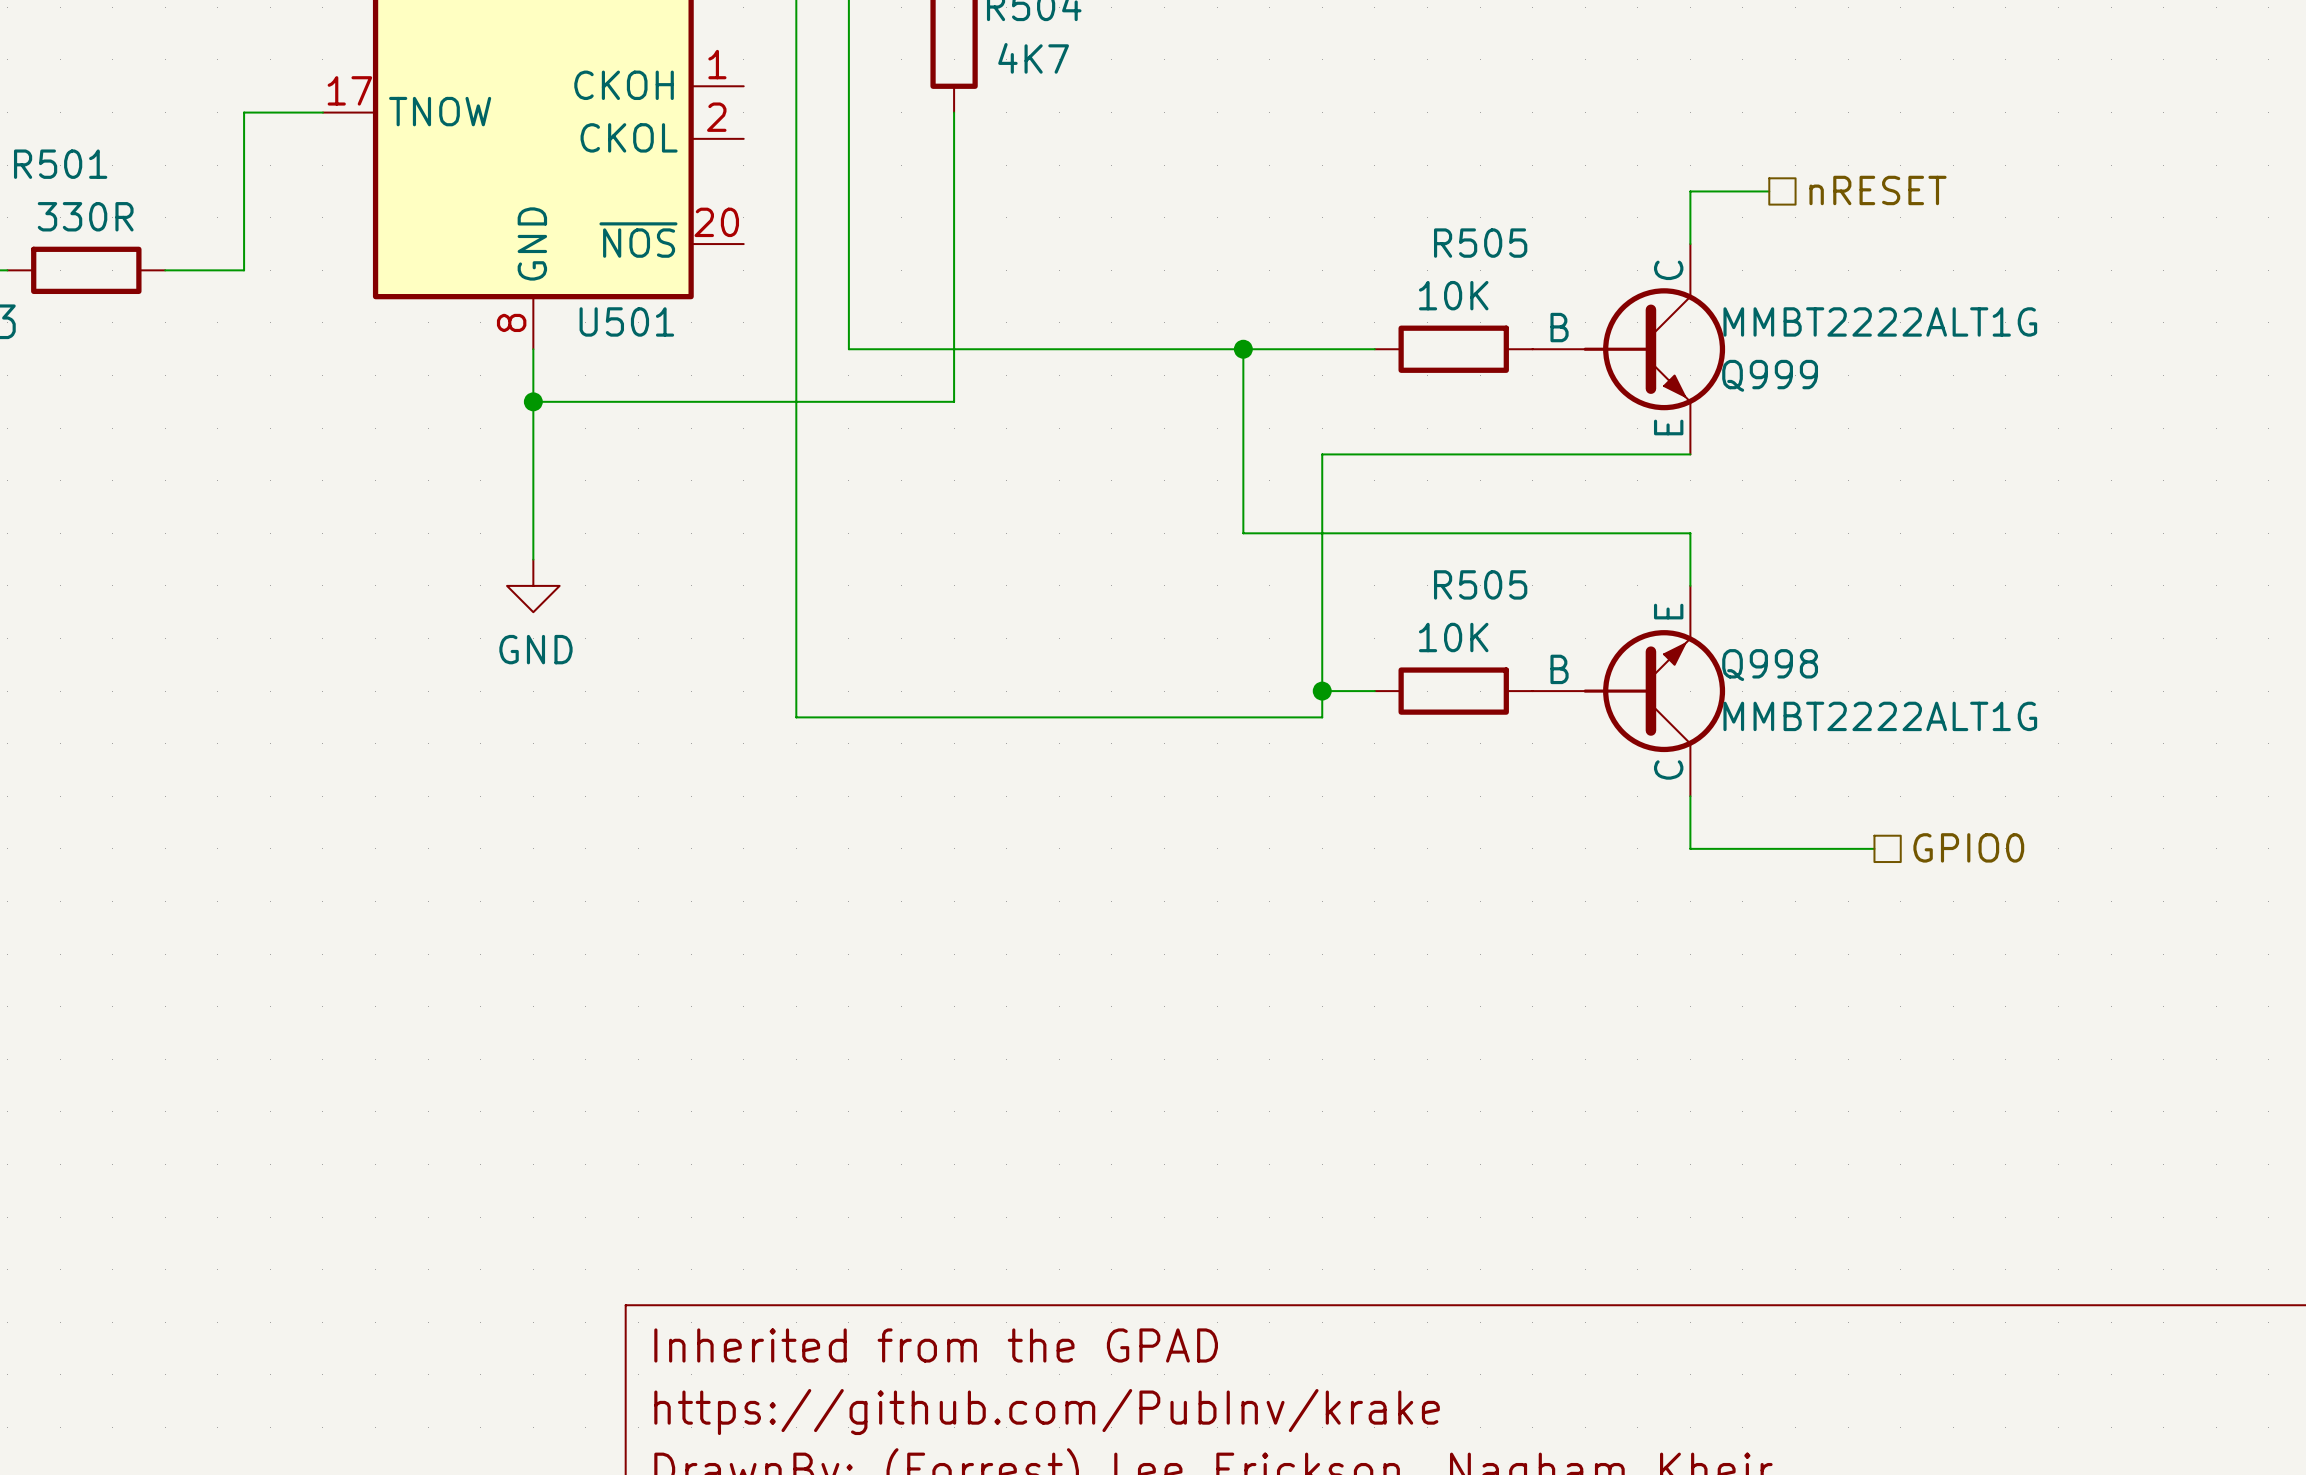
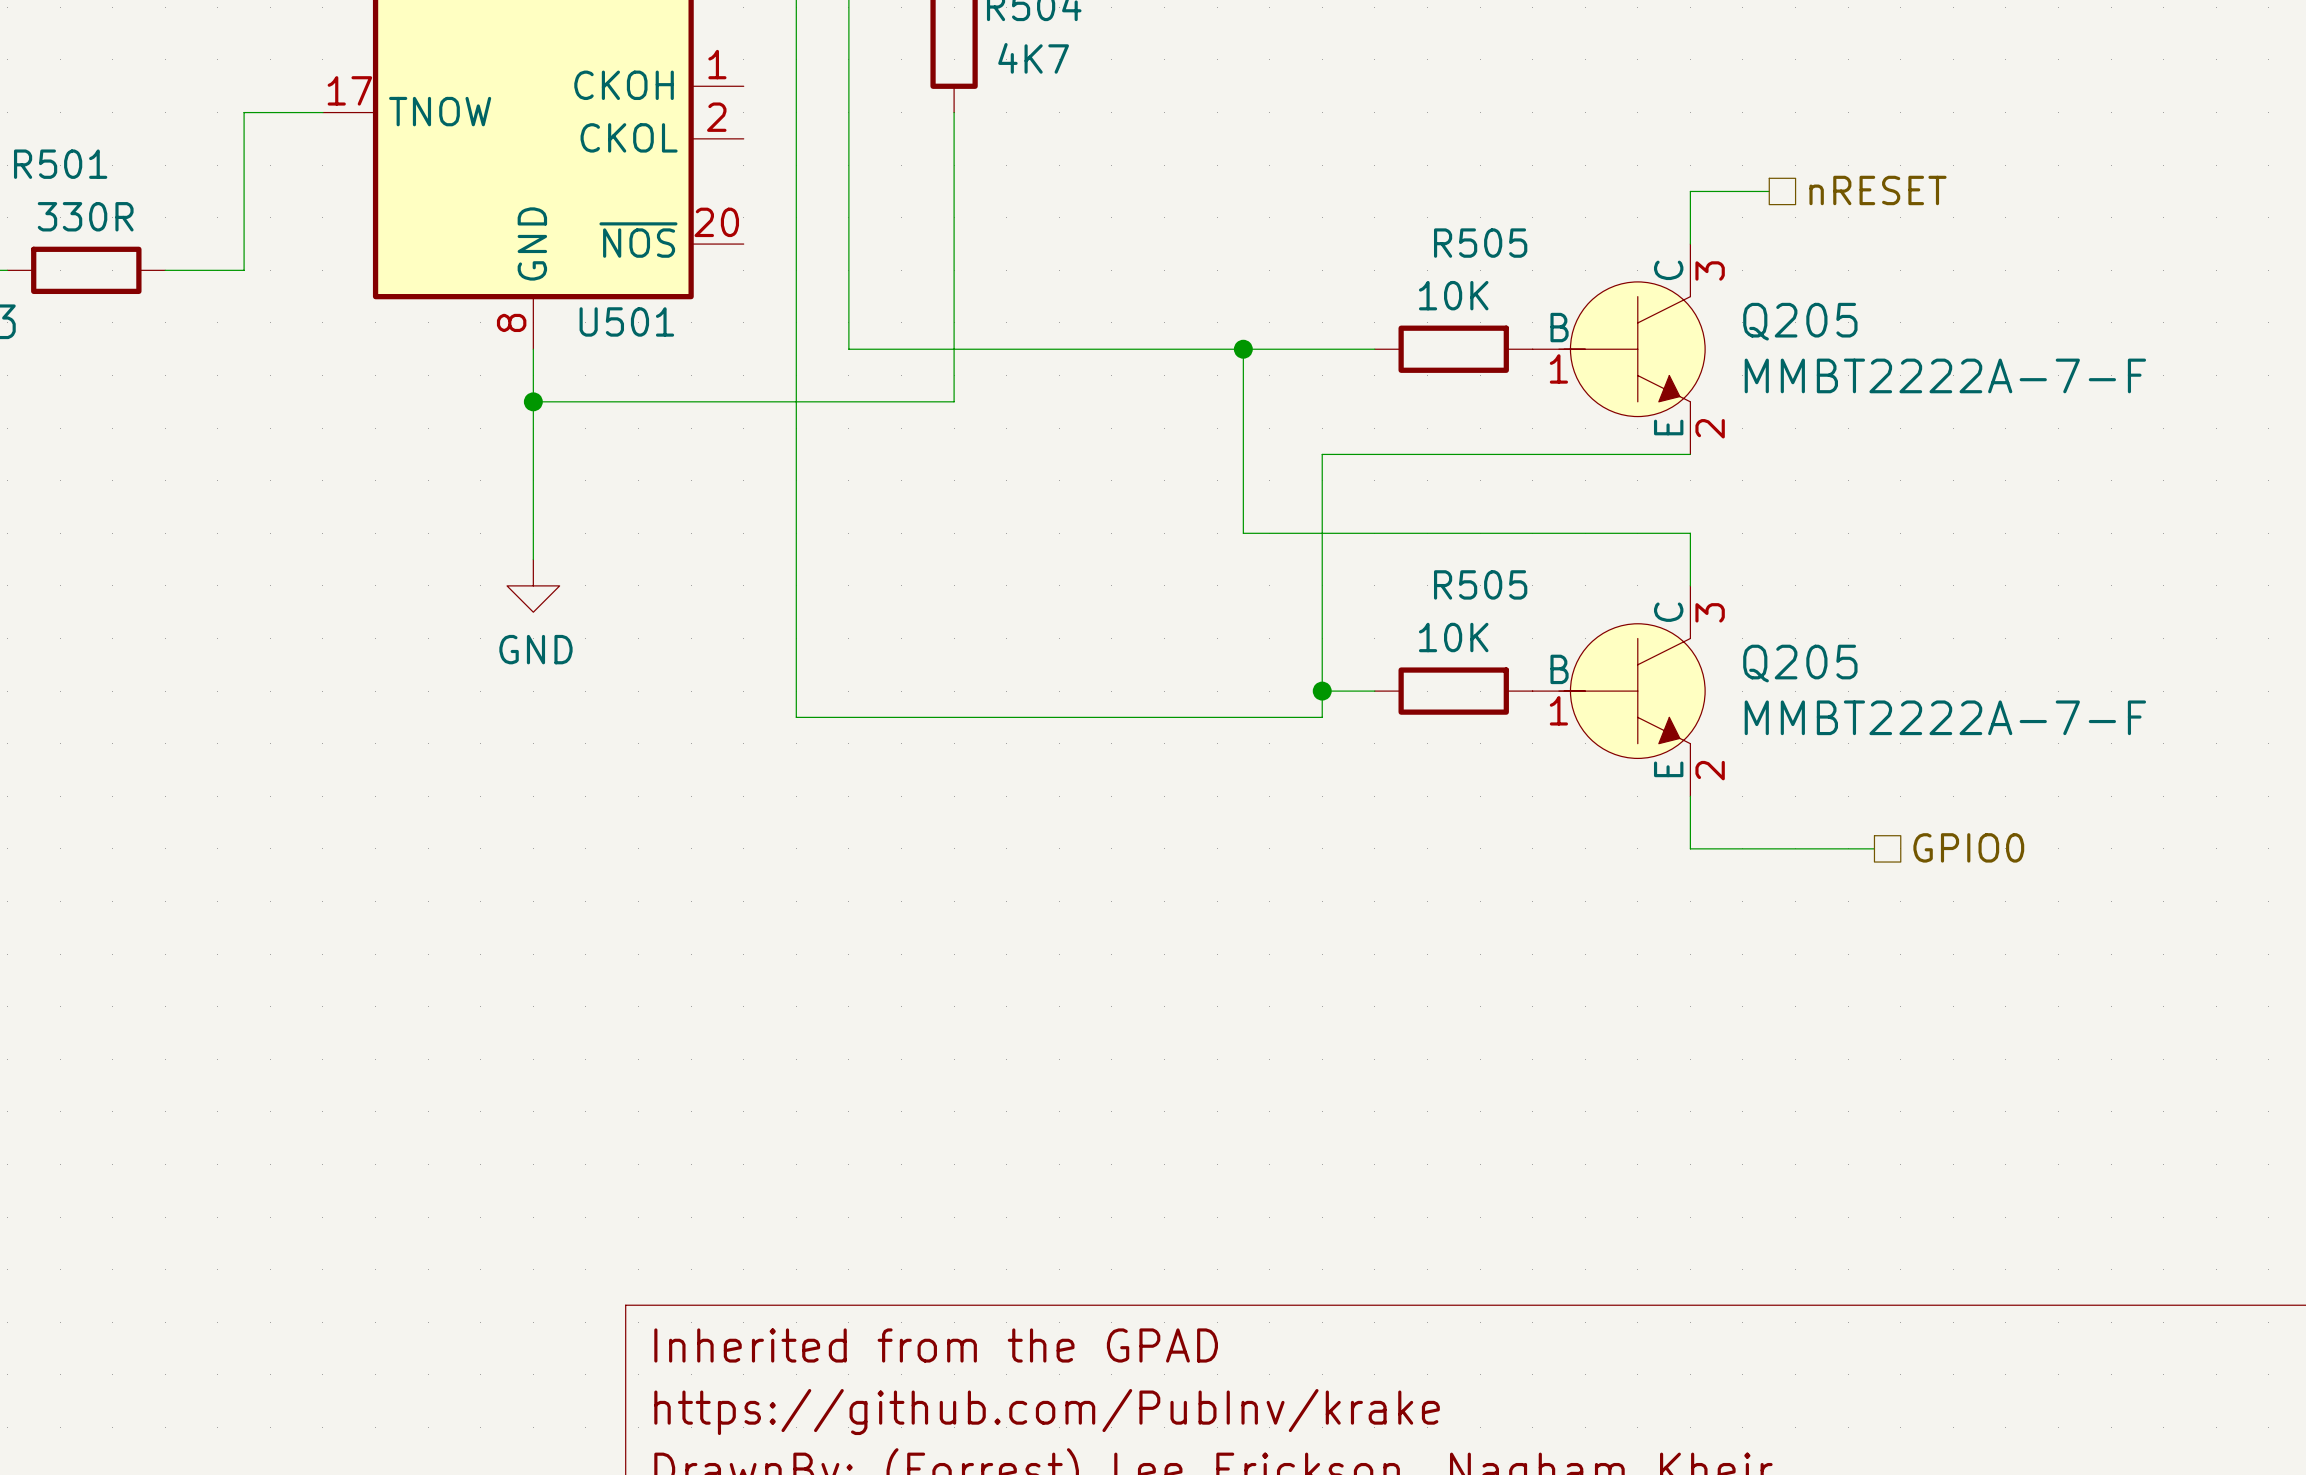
Q205: none -> MMBT2222A-7-F (1618, 349)
Q999: MMBT2222ALT1G (1628, 349) -> none
Q205: none -> MMBT2222A-7-F (1618, 691)
Q998: MMBT2222ALT1G (1628, 691) -> none

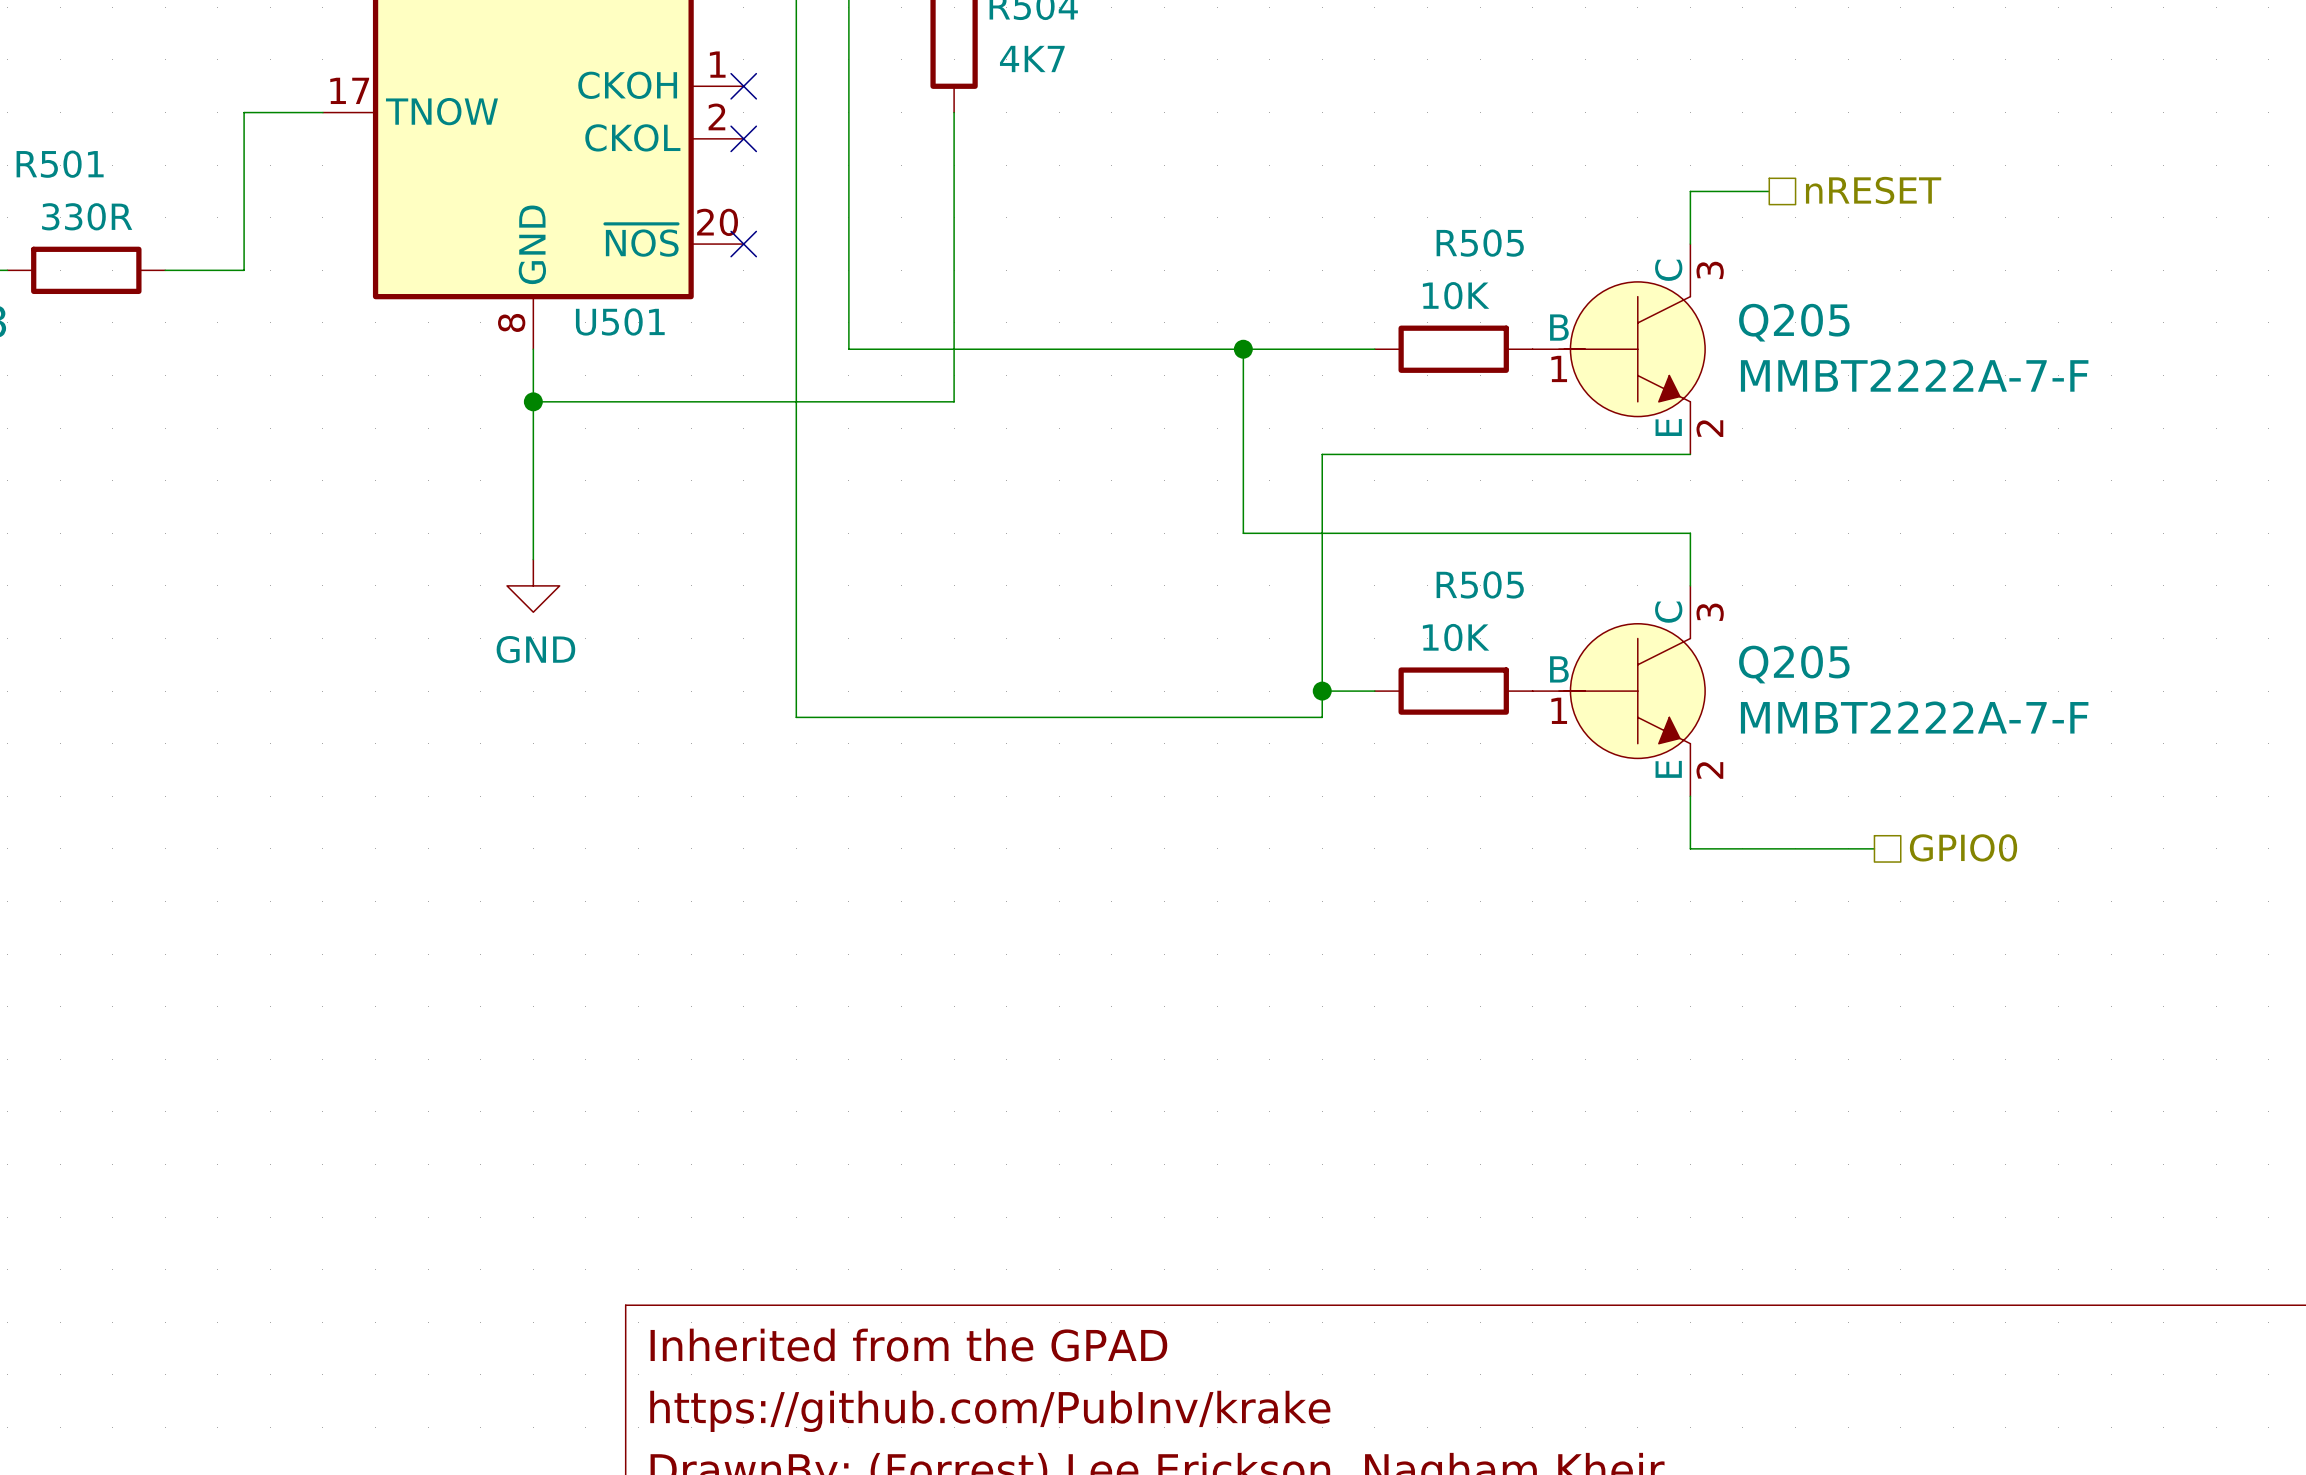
no-connect mark: none -> (743, 86)
no-connect mark: none -> (743, 138)
no-connect mark: none -> (743, 244)

